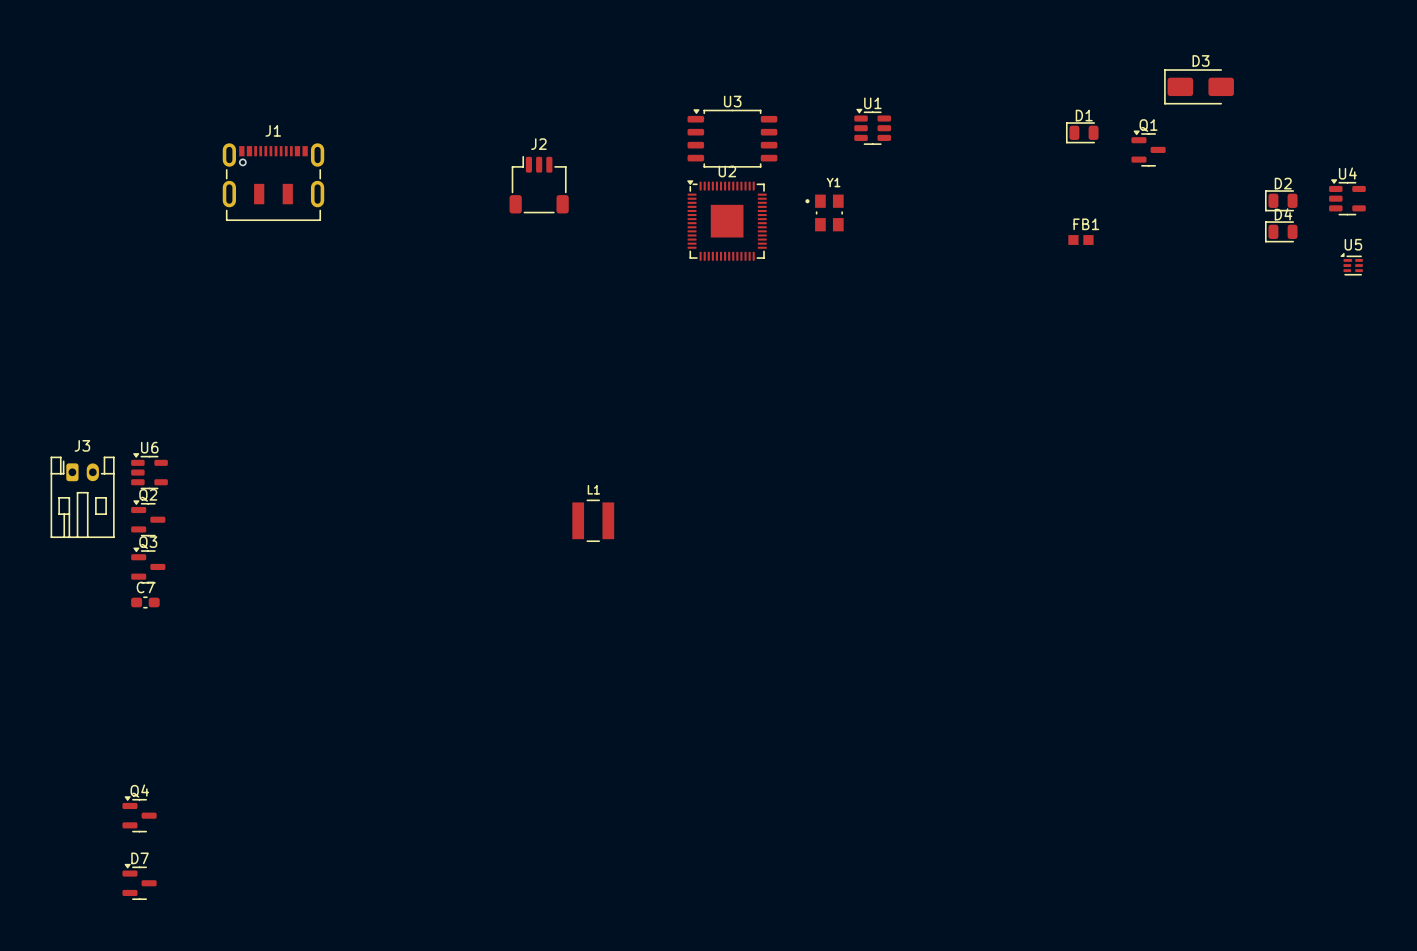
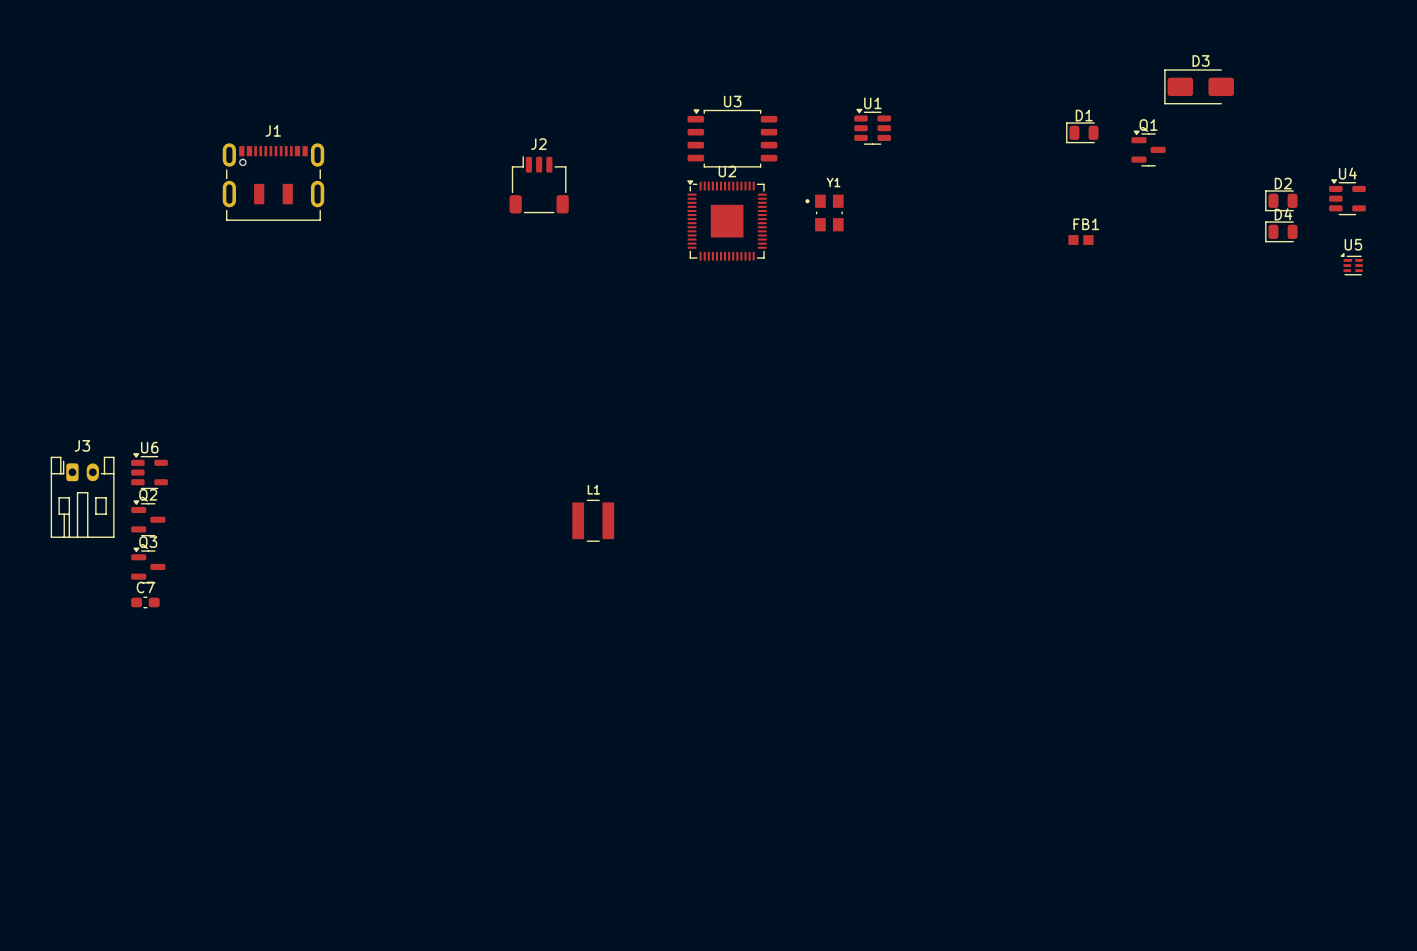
Q4: (139, 814) -> none
D7: (139, 881) -> none

